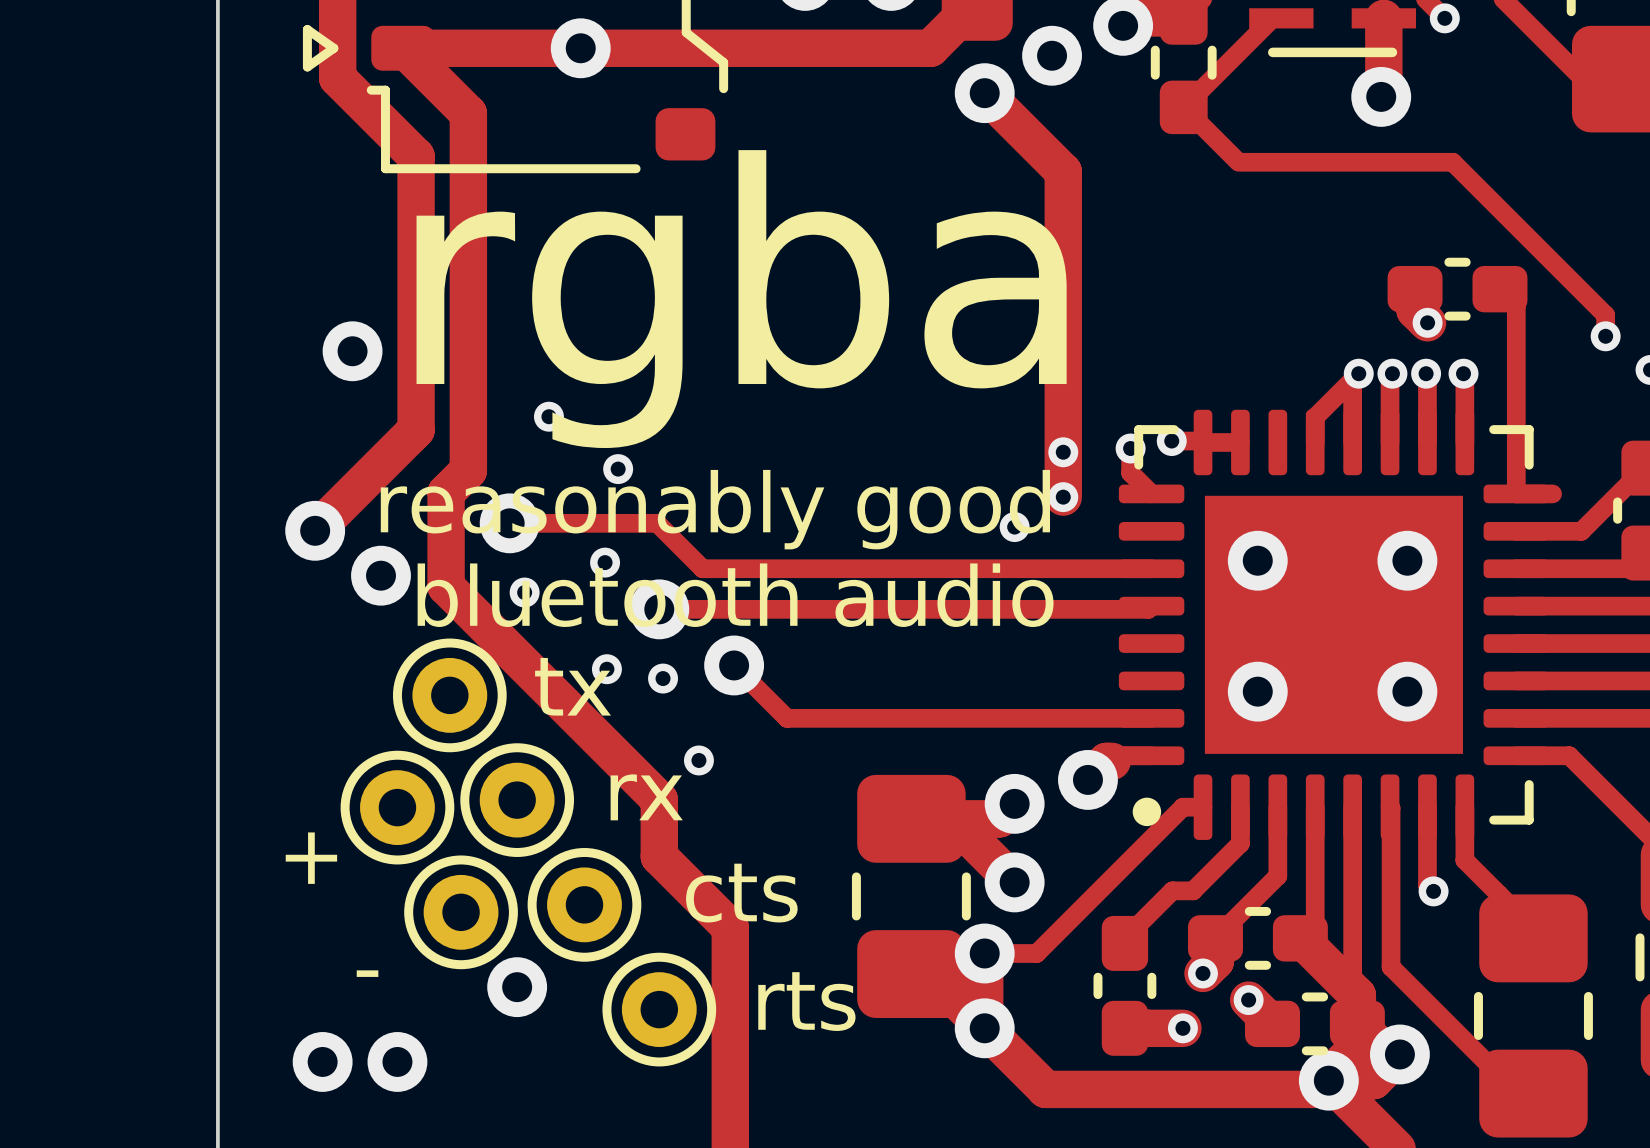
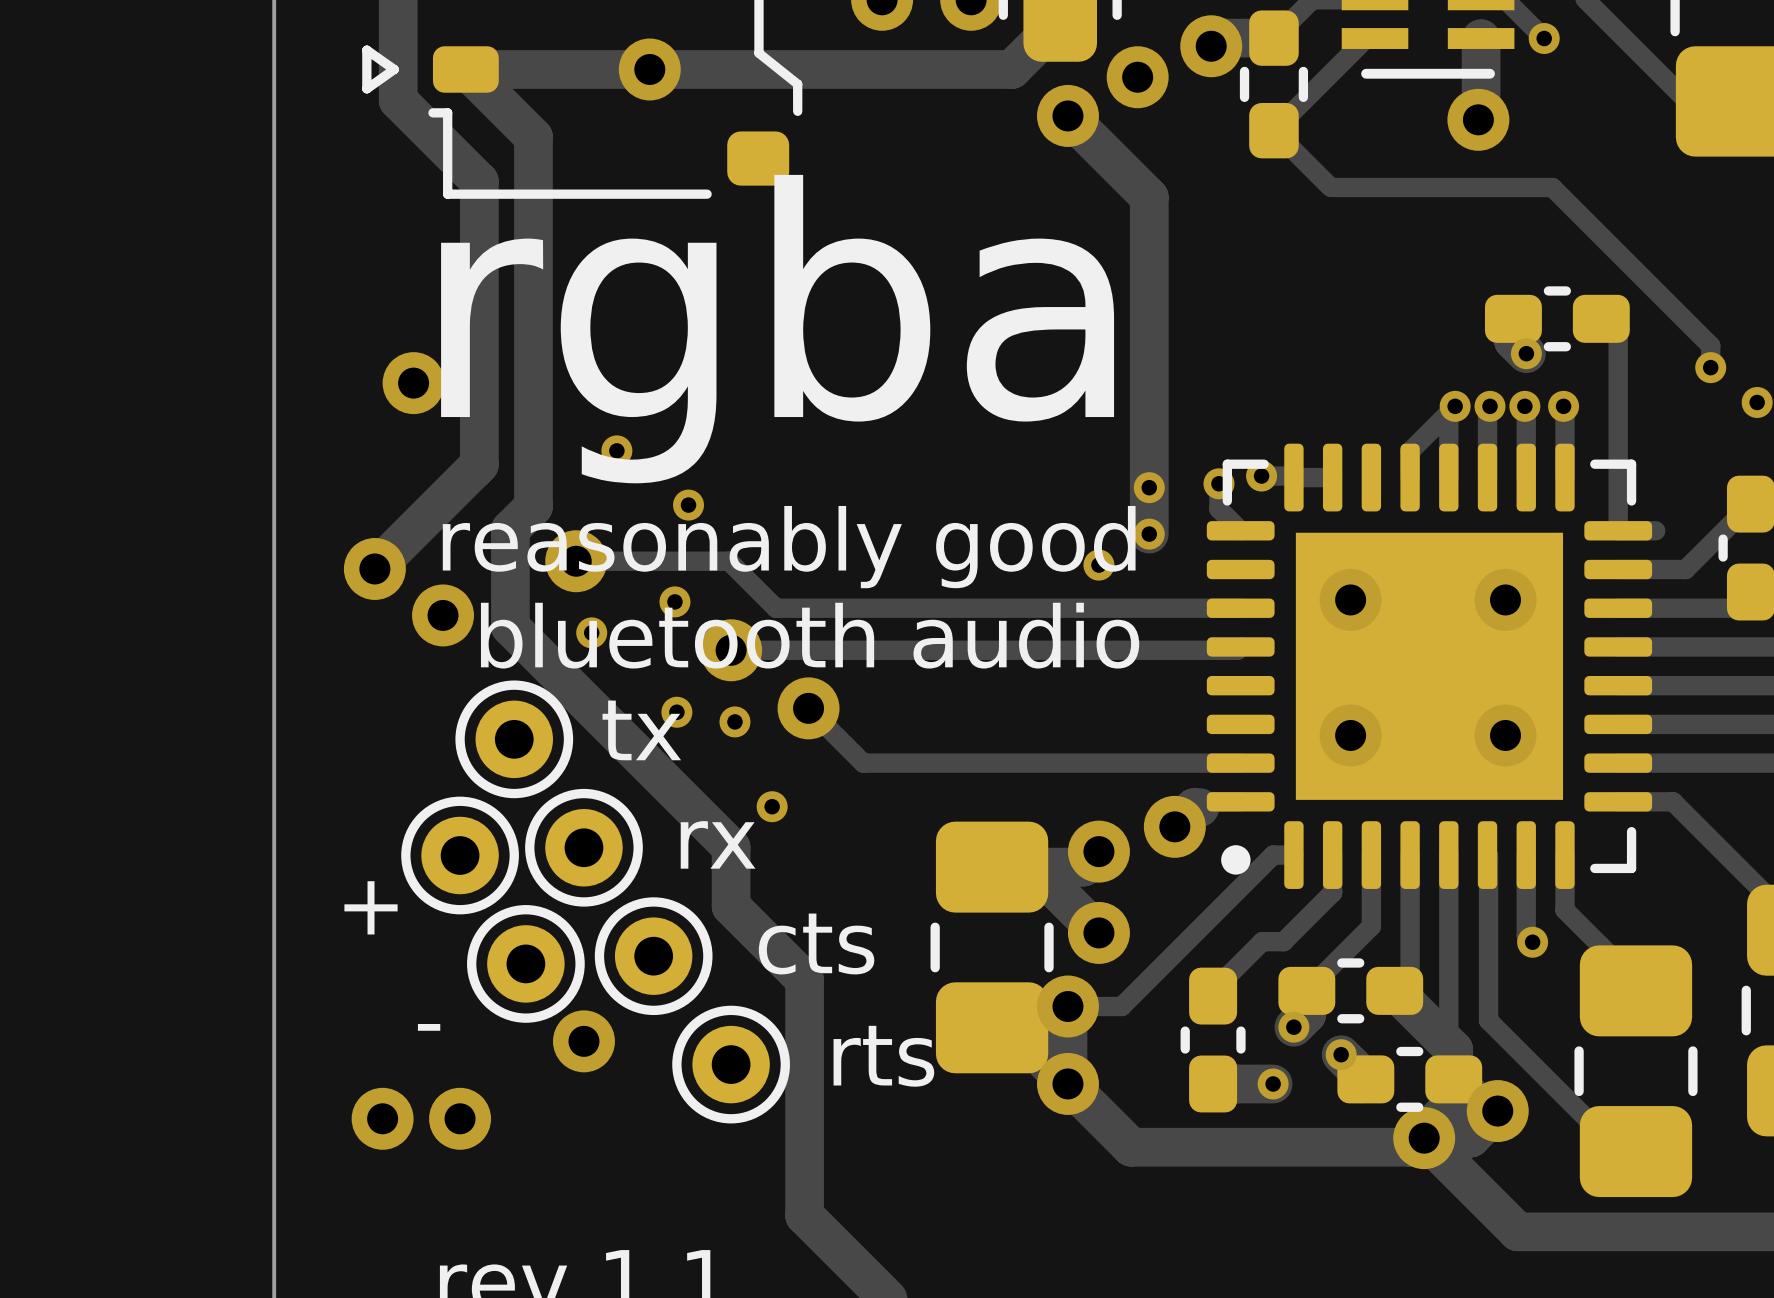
text position: rgba (741, 299) -> rgba (777, 329)

